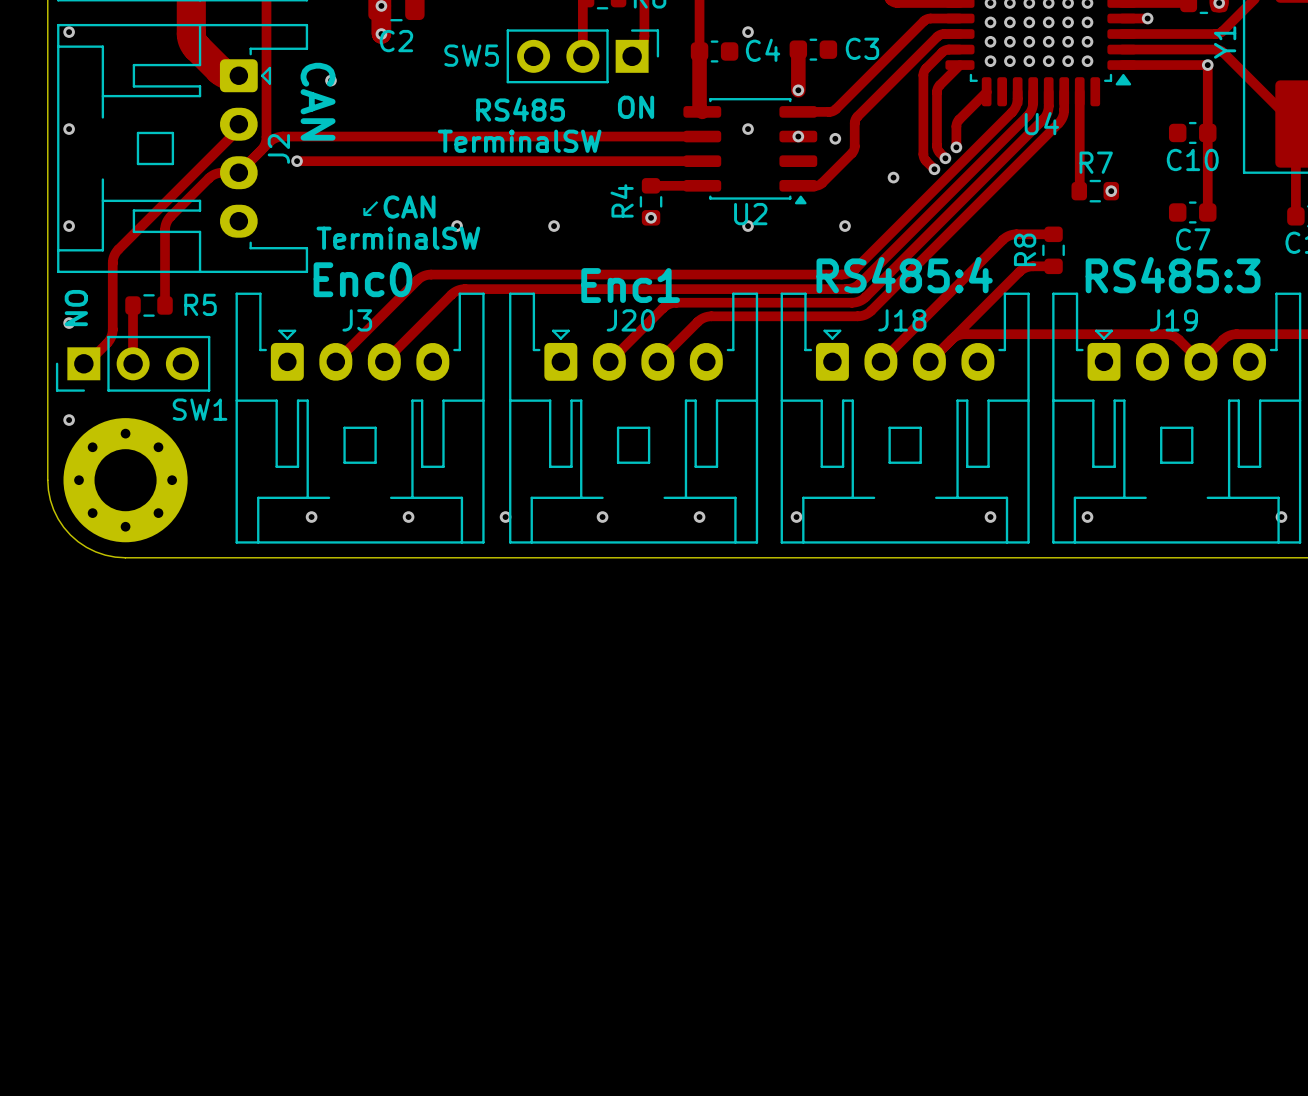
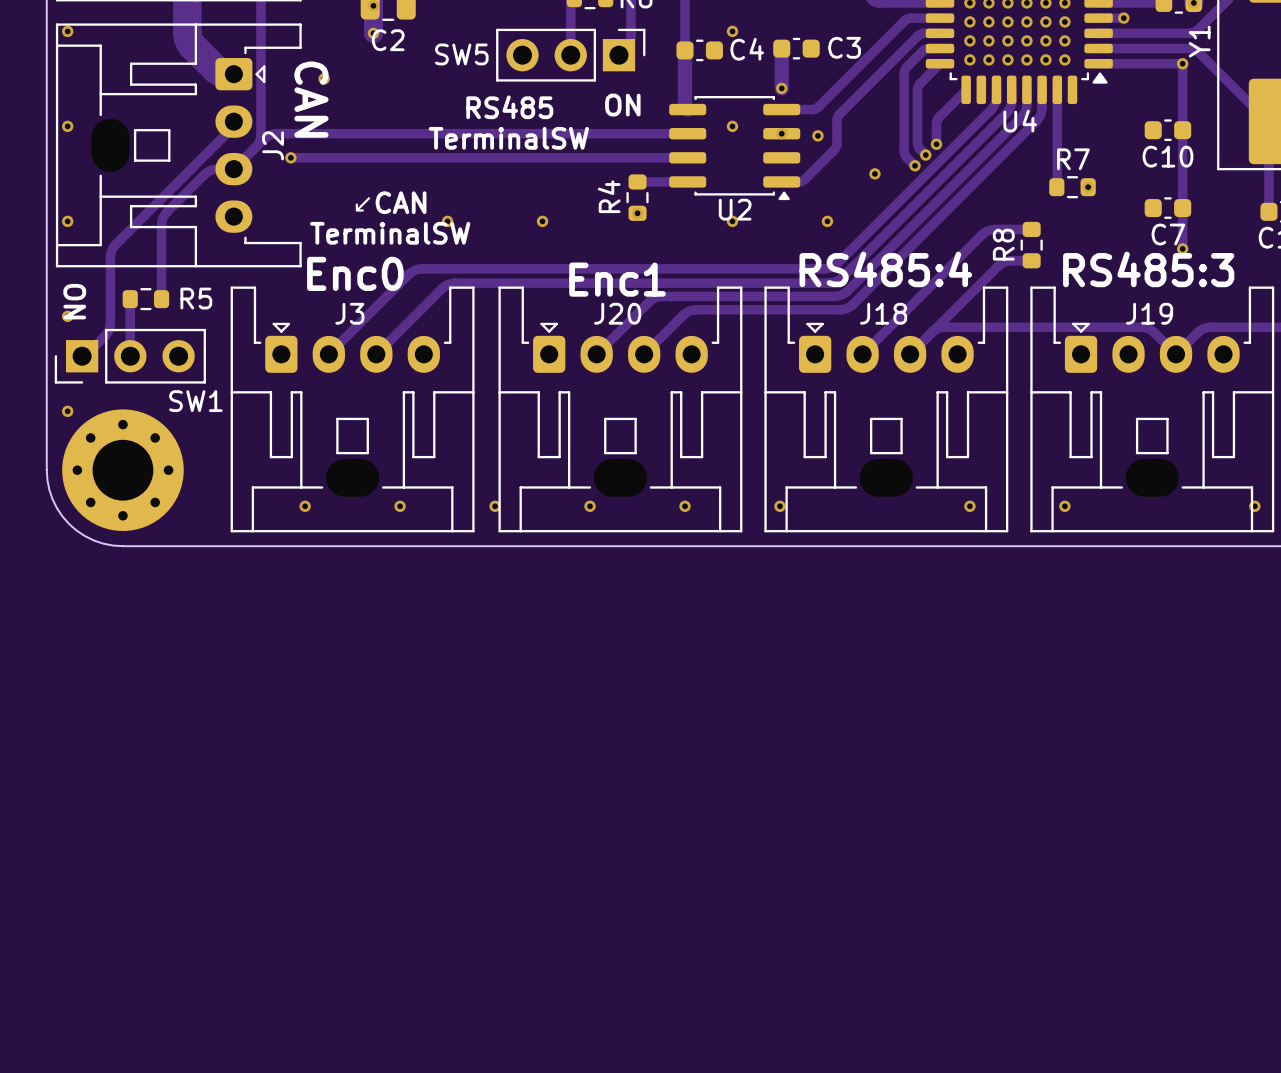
track: none -> (1182, 208) (1182, 248)
via: none -> (1182, 248)

